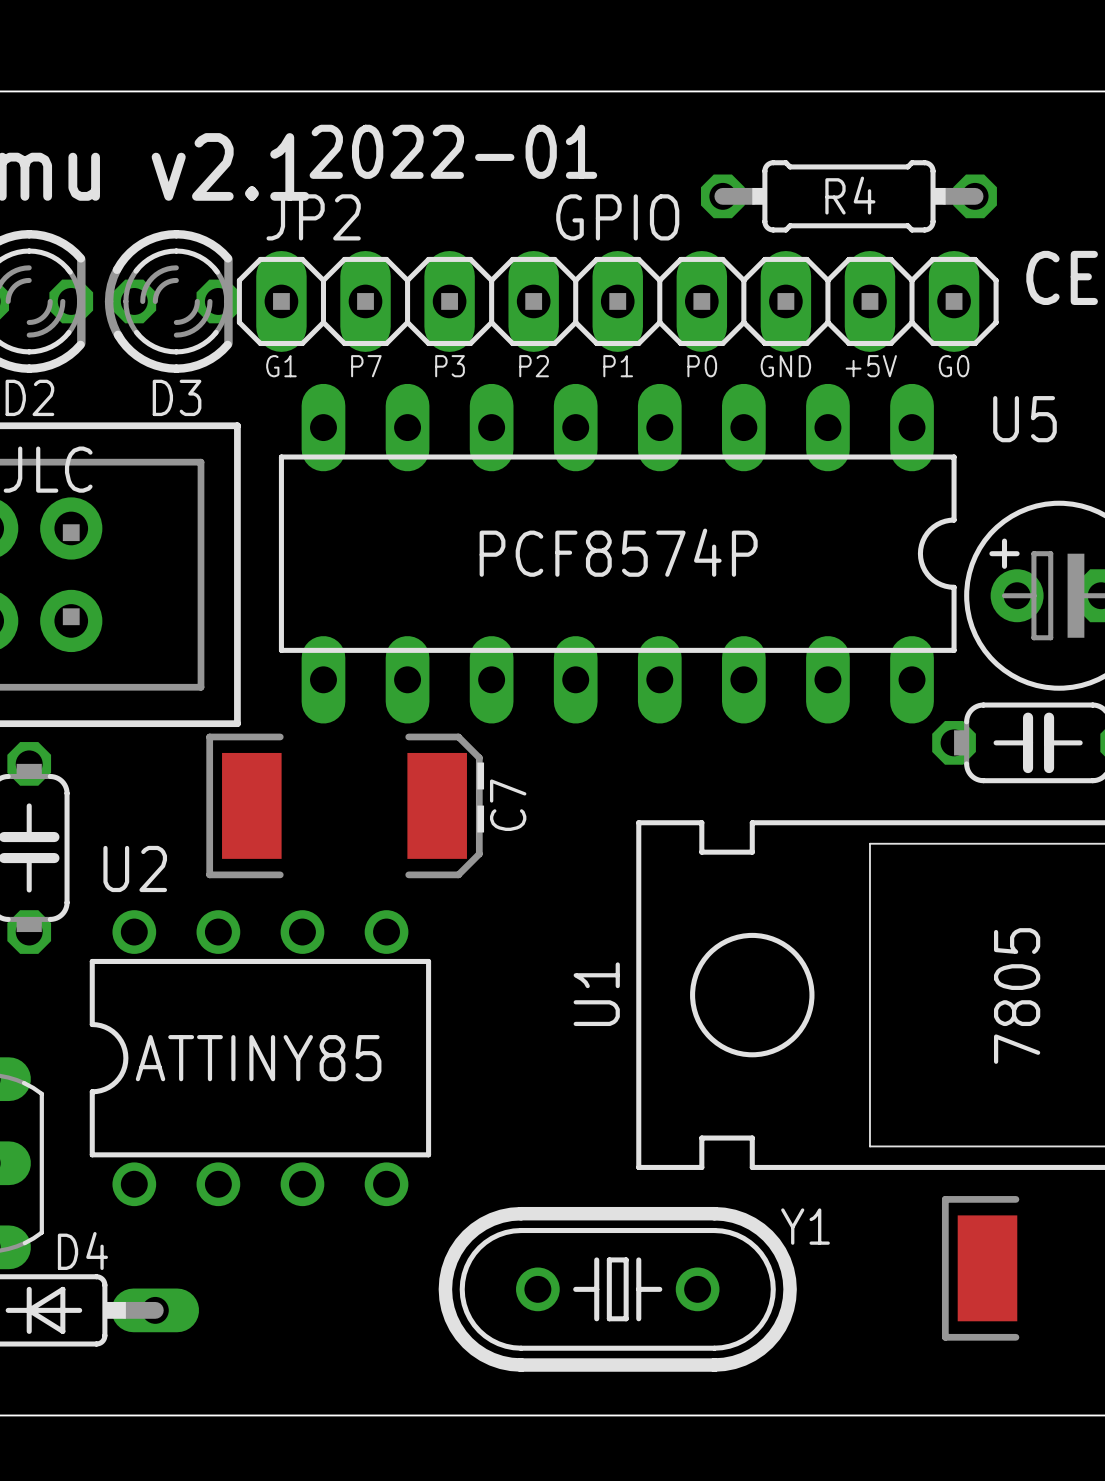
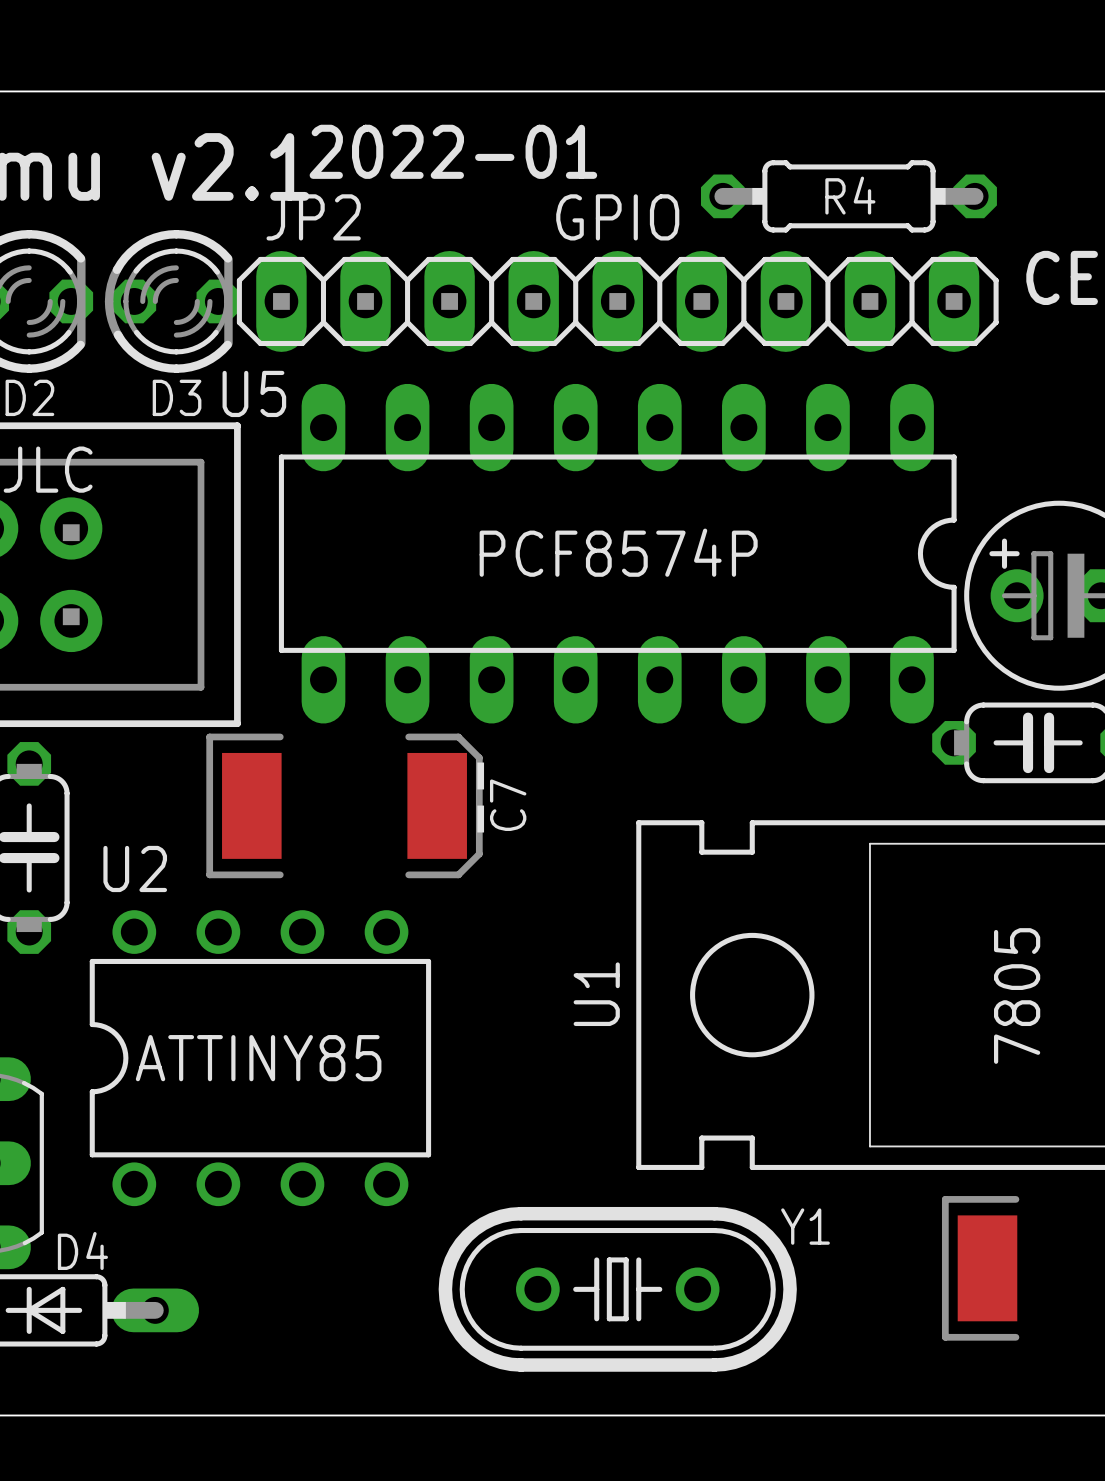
text: G1 (281, 366) -> none
text: P7 (366, 366) -> none
text: P3 (450, 366) -> none
text: P2 (534, 366) -> none
text: P1 (618, 366) -> none
text: P0 (702, 366) -> none
text: GND (785, 366) -> none
text: +5V (871, 366) -> none
text: G0 (954, 366) -> none
U5 name position: U5 (1024, 419) -> U5 (254, 393)

